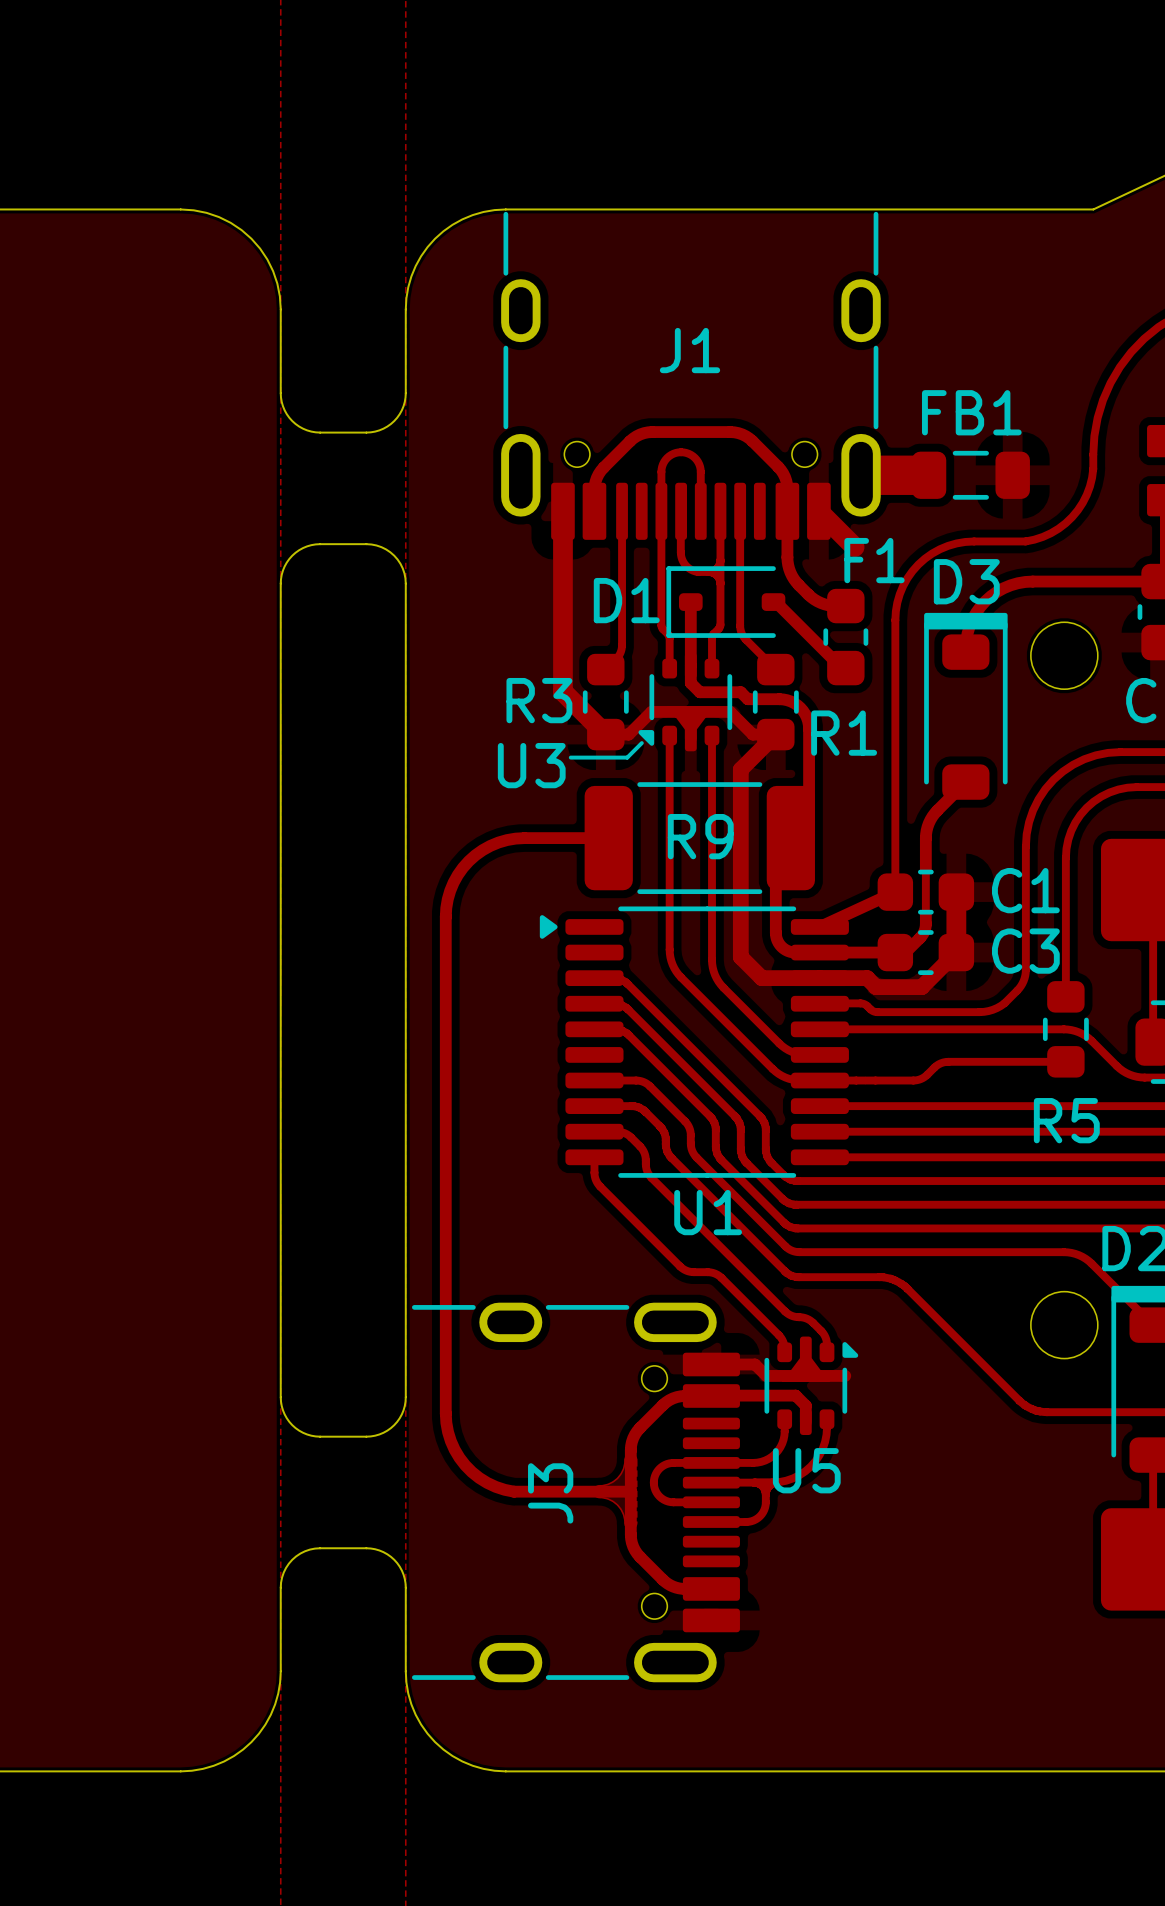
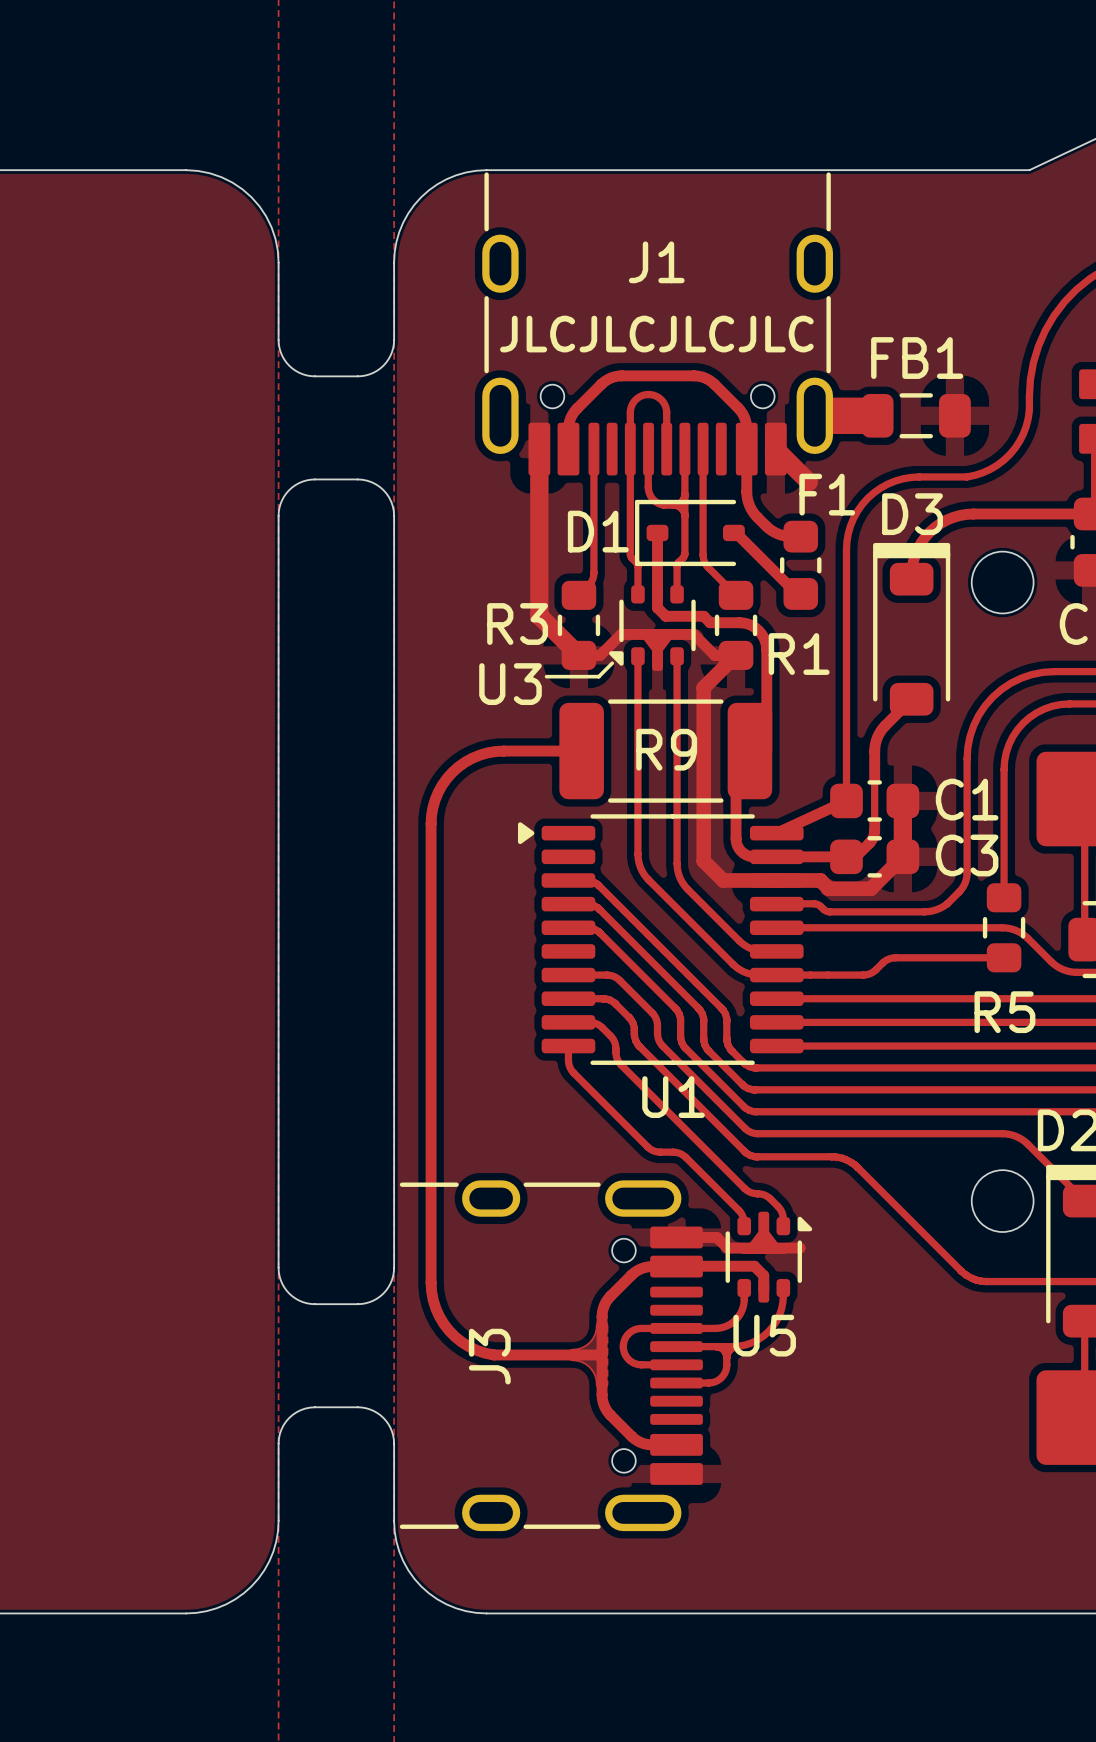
J1 name position: J1 (690, 350) -> J1 (656, 262)
text: none -> JLCJLCJLCJLC (656, 334)
J3 name position: J3 (550, 1493) -> J3 (489, 1356)

